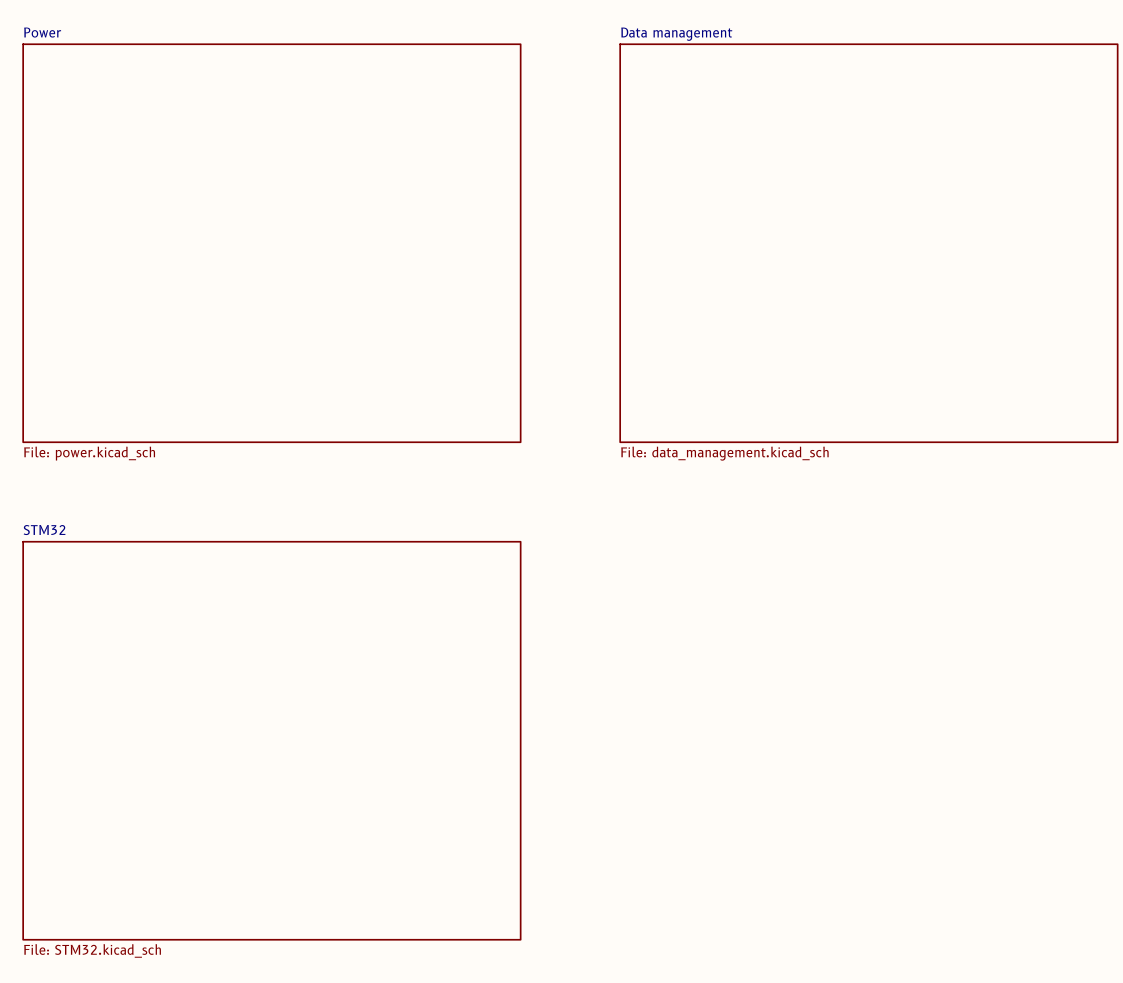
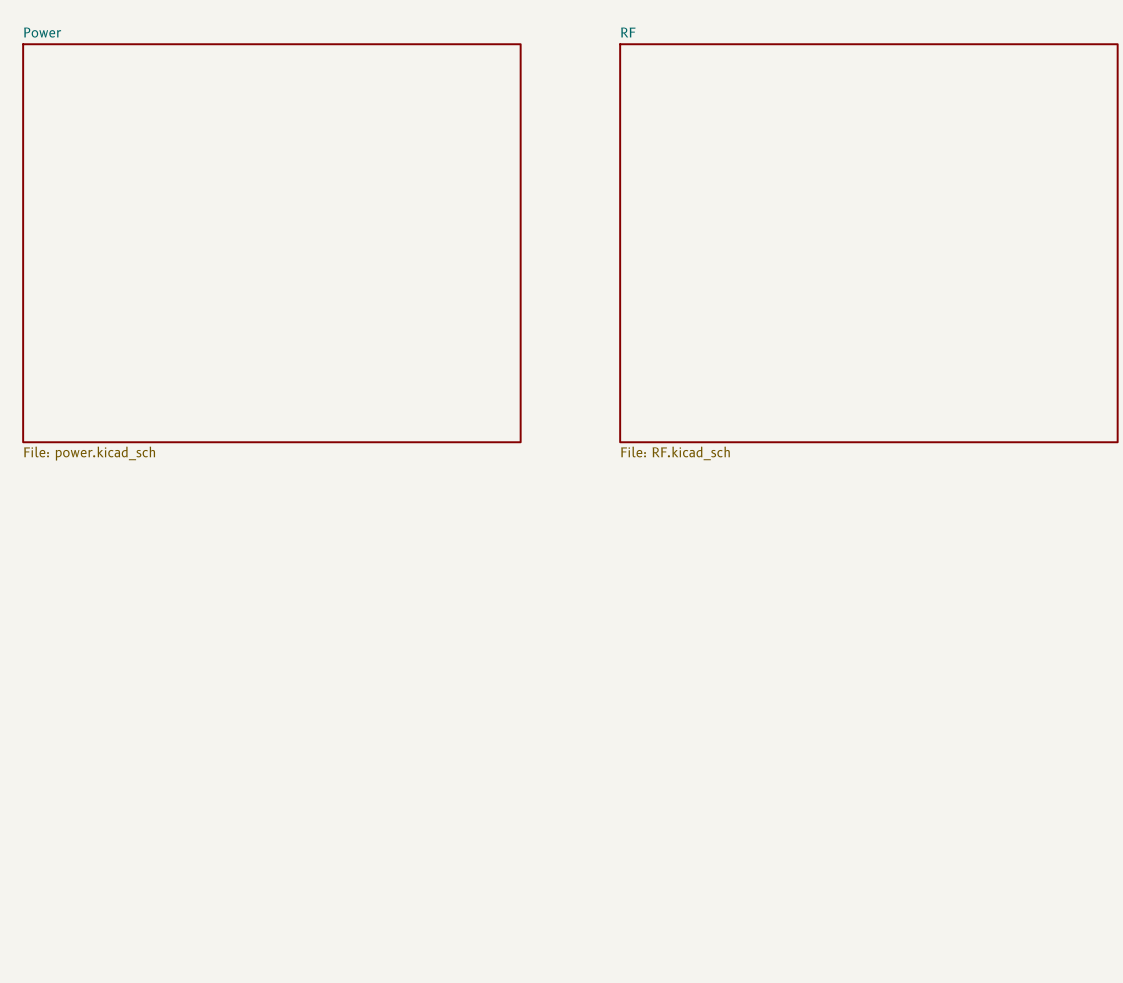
sheet Data management name: Data management (676, 34) -> RF (628, 32)
sheet Data management value: File: data_management.kicad_sch (724, 453) -> File: RF.kicad_sch (675, 453)
sheet STM32: File: STM32.kicad_sch (271, 740) -> none

